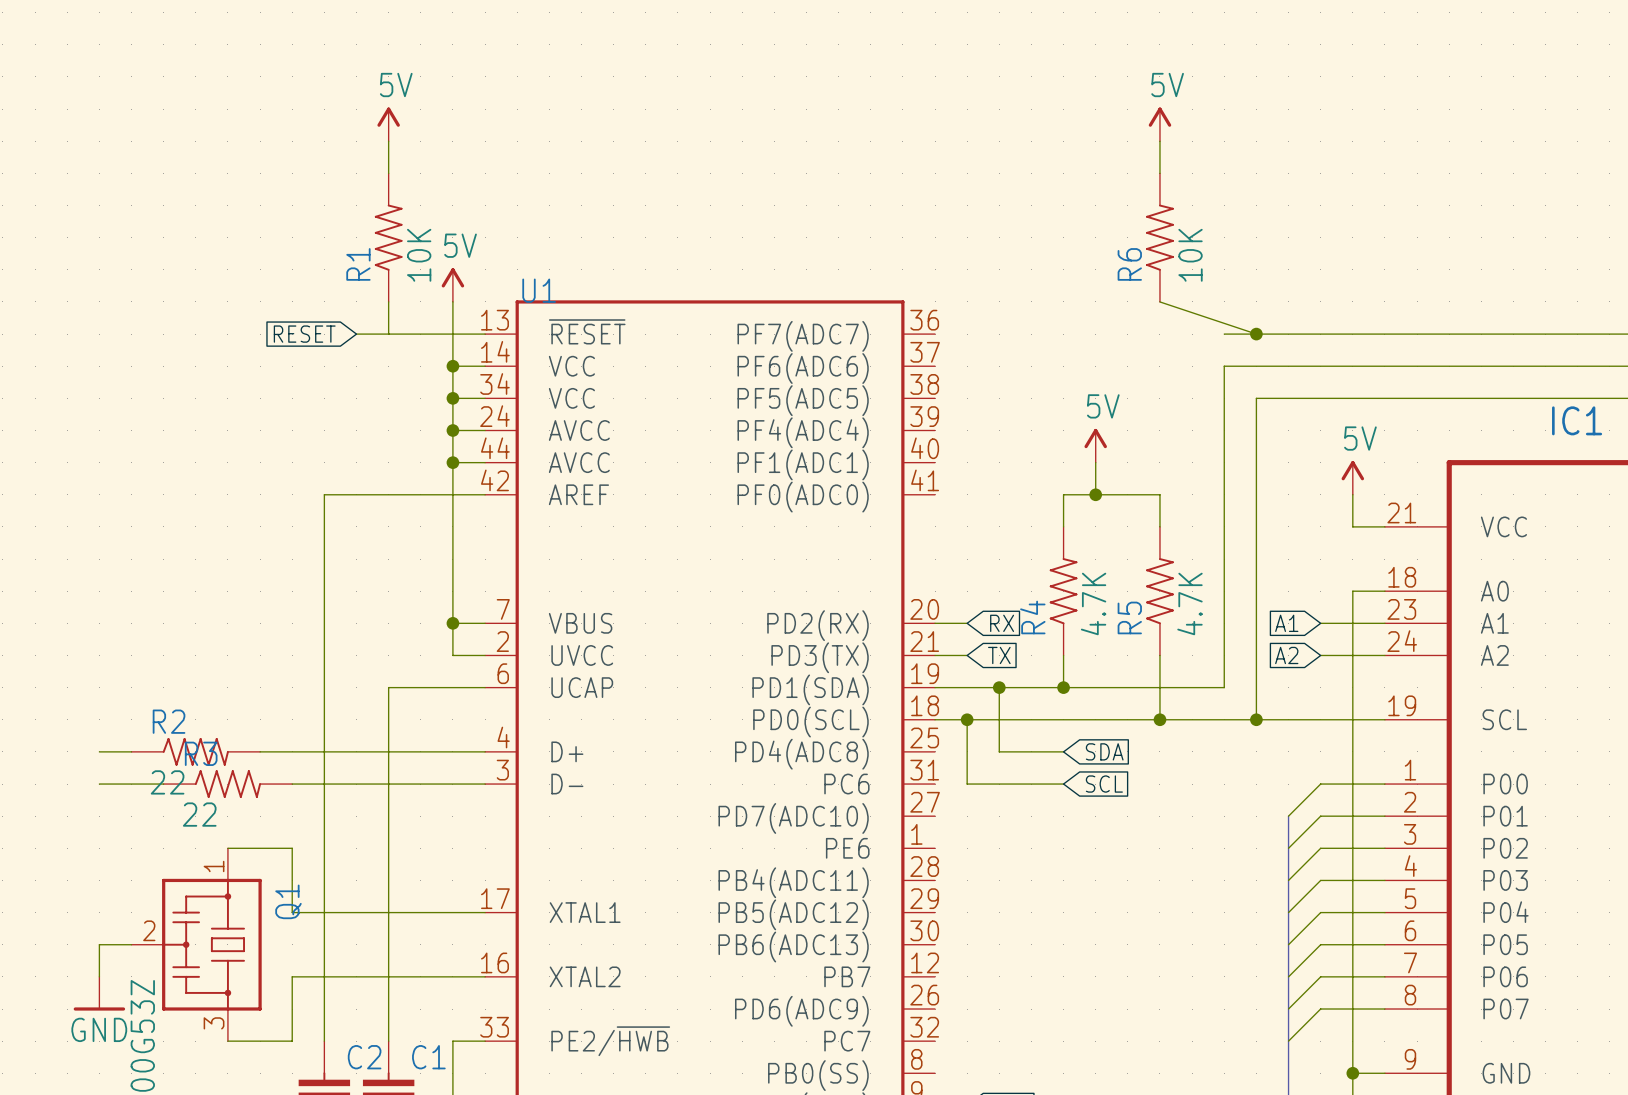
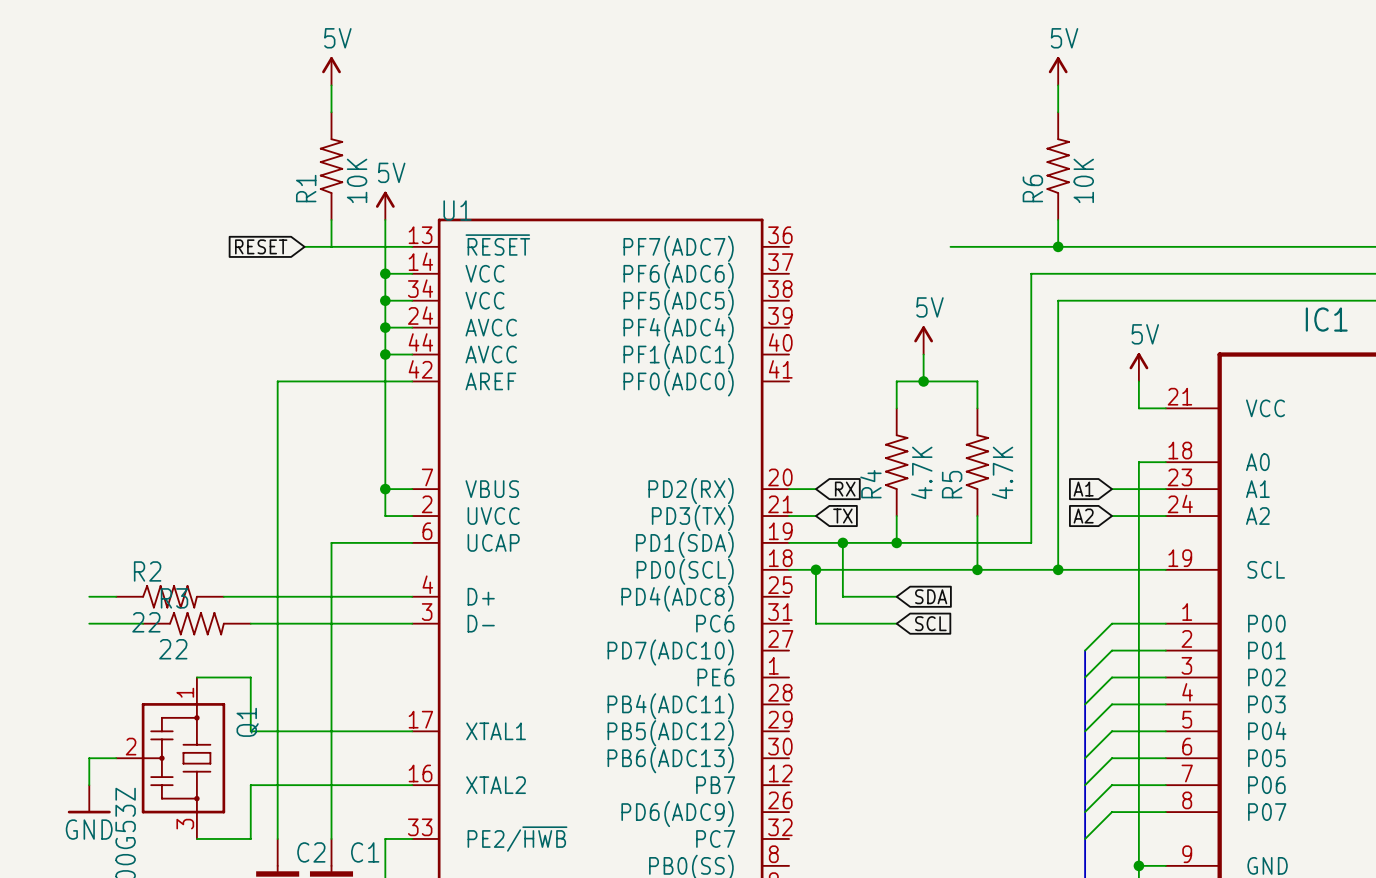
power symbol position: 5V (1159, 124) -> 5V (1058, 71)
wire: (1159, 141) (1159, 173) -> (1058, 85) (1058, 112)
R6 position: (1159, 237) -> (1058, 166)
wire: (1159, 301) (1256, 334) -> (1058, 219) (1058, 246)
wire: none -> (950, 246) (1031, 246)

